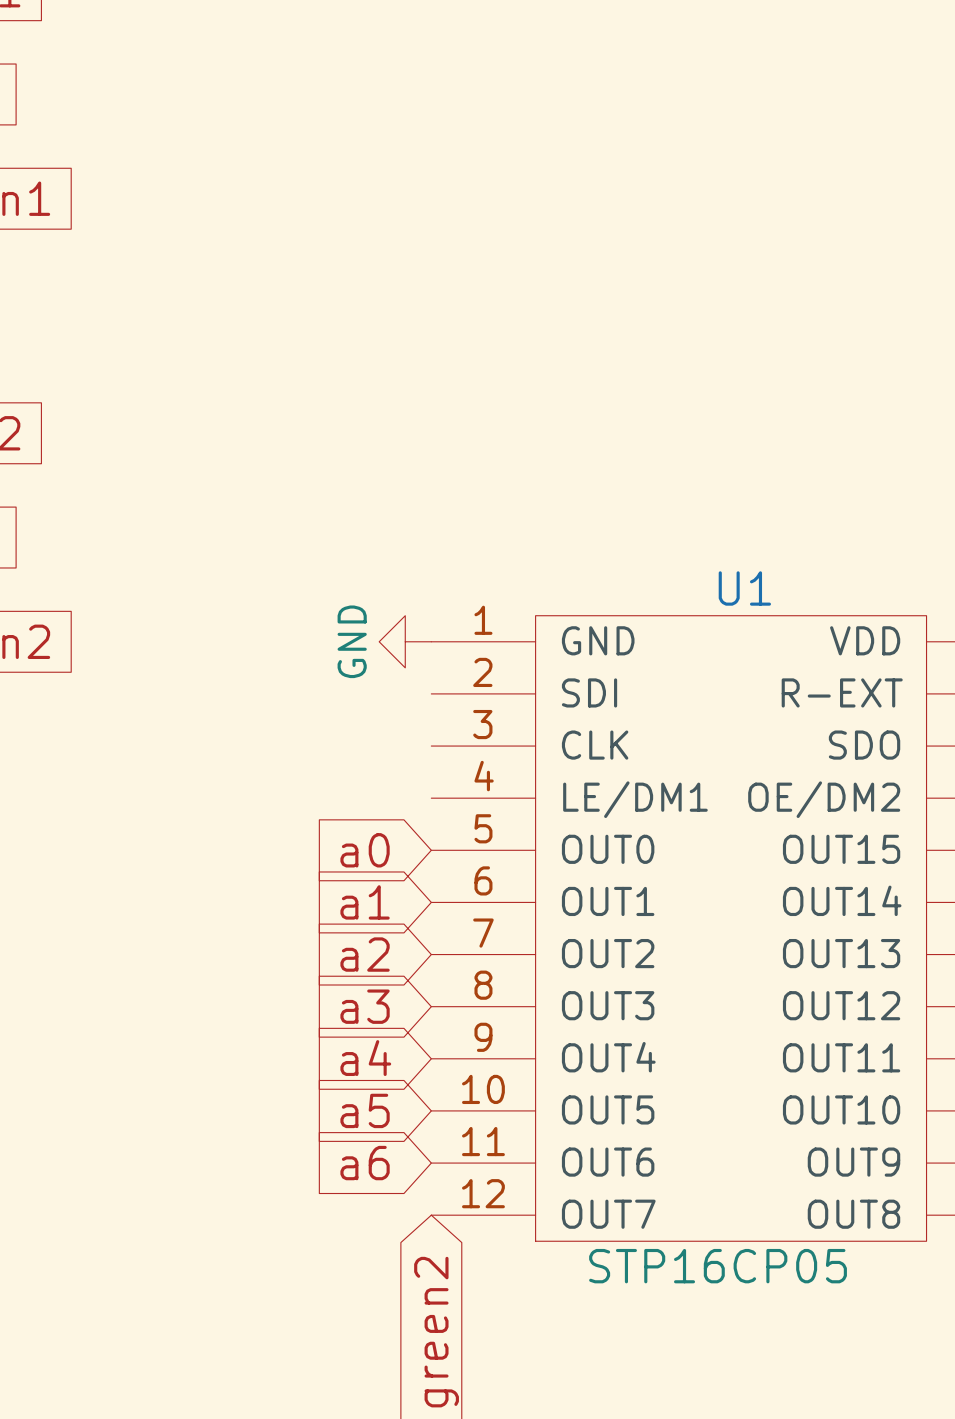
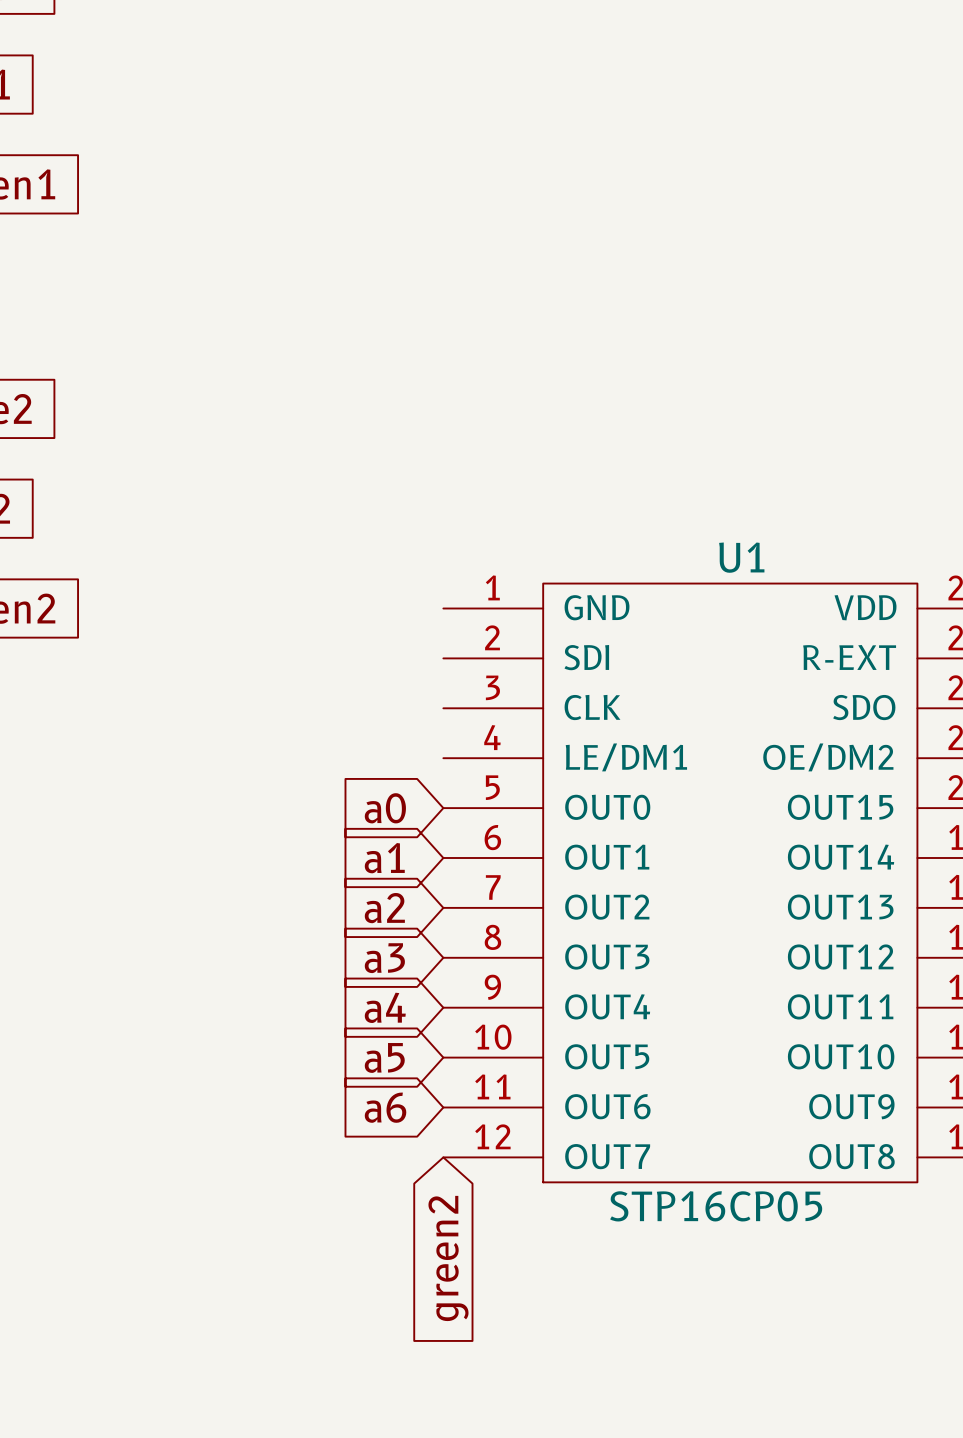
power symbol: GND (405, 641) -> none

